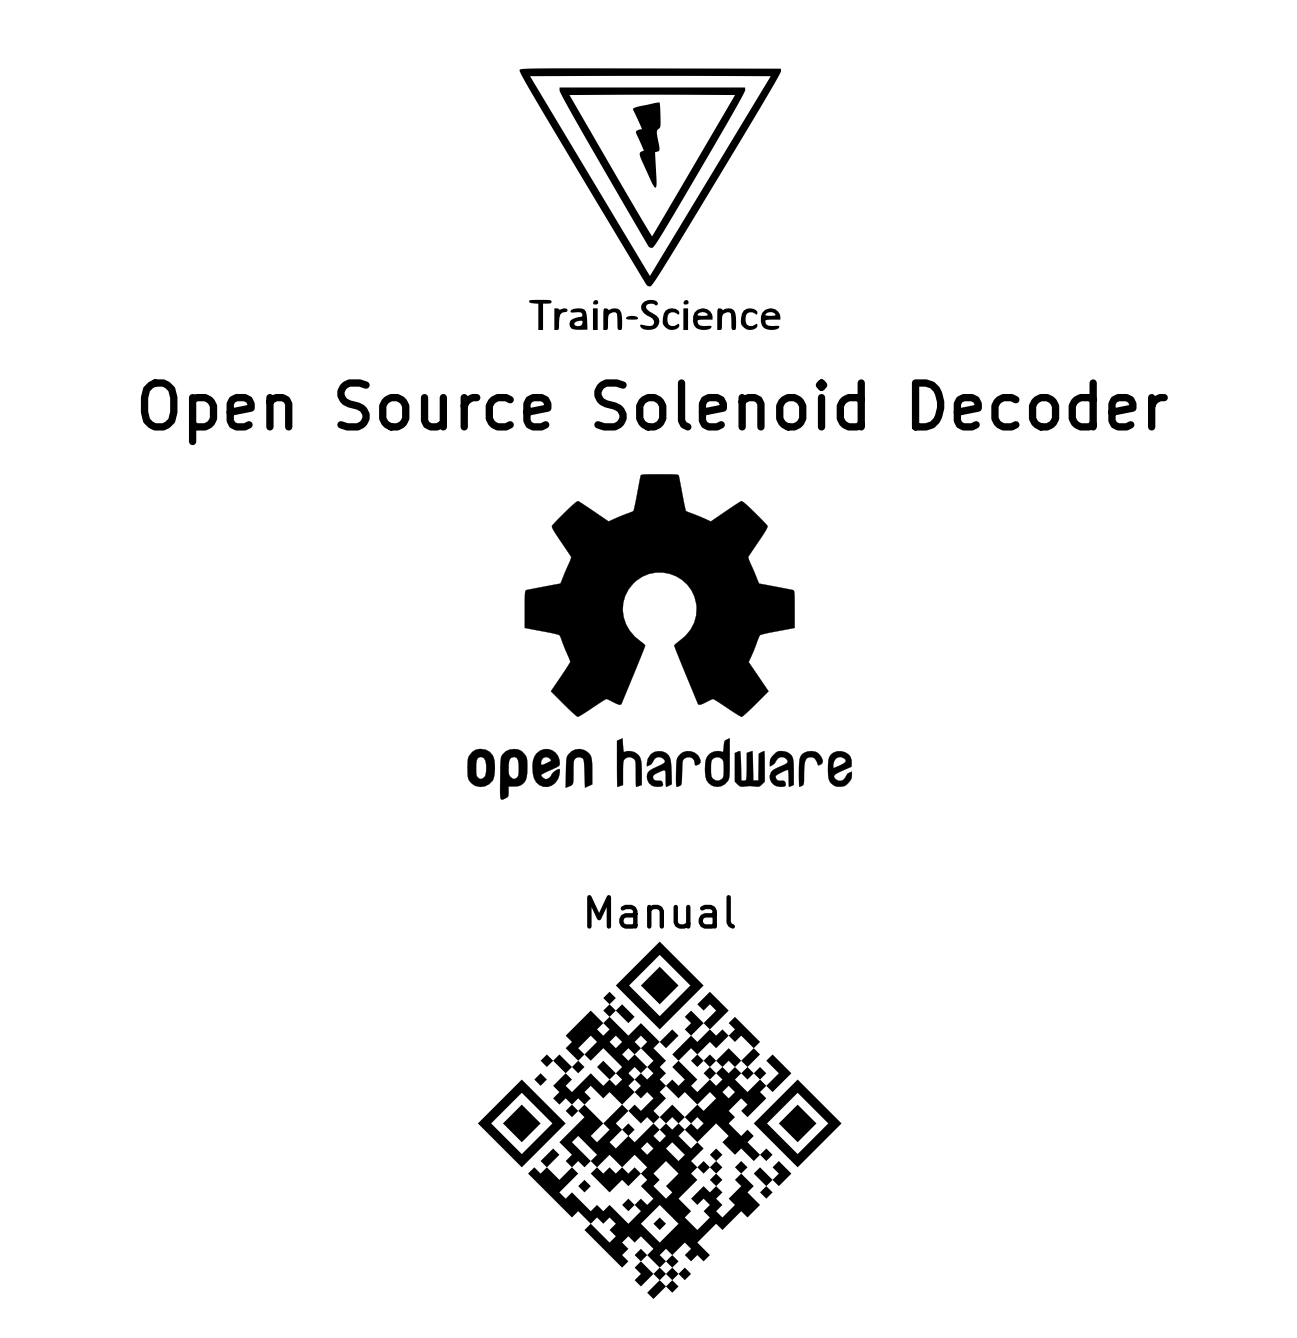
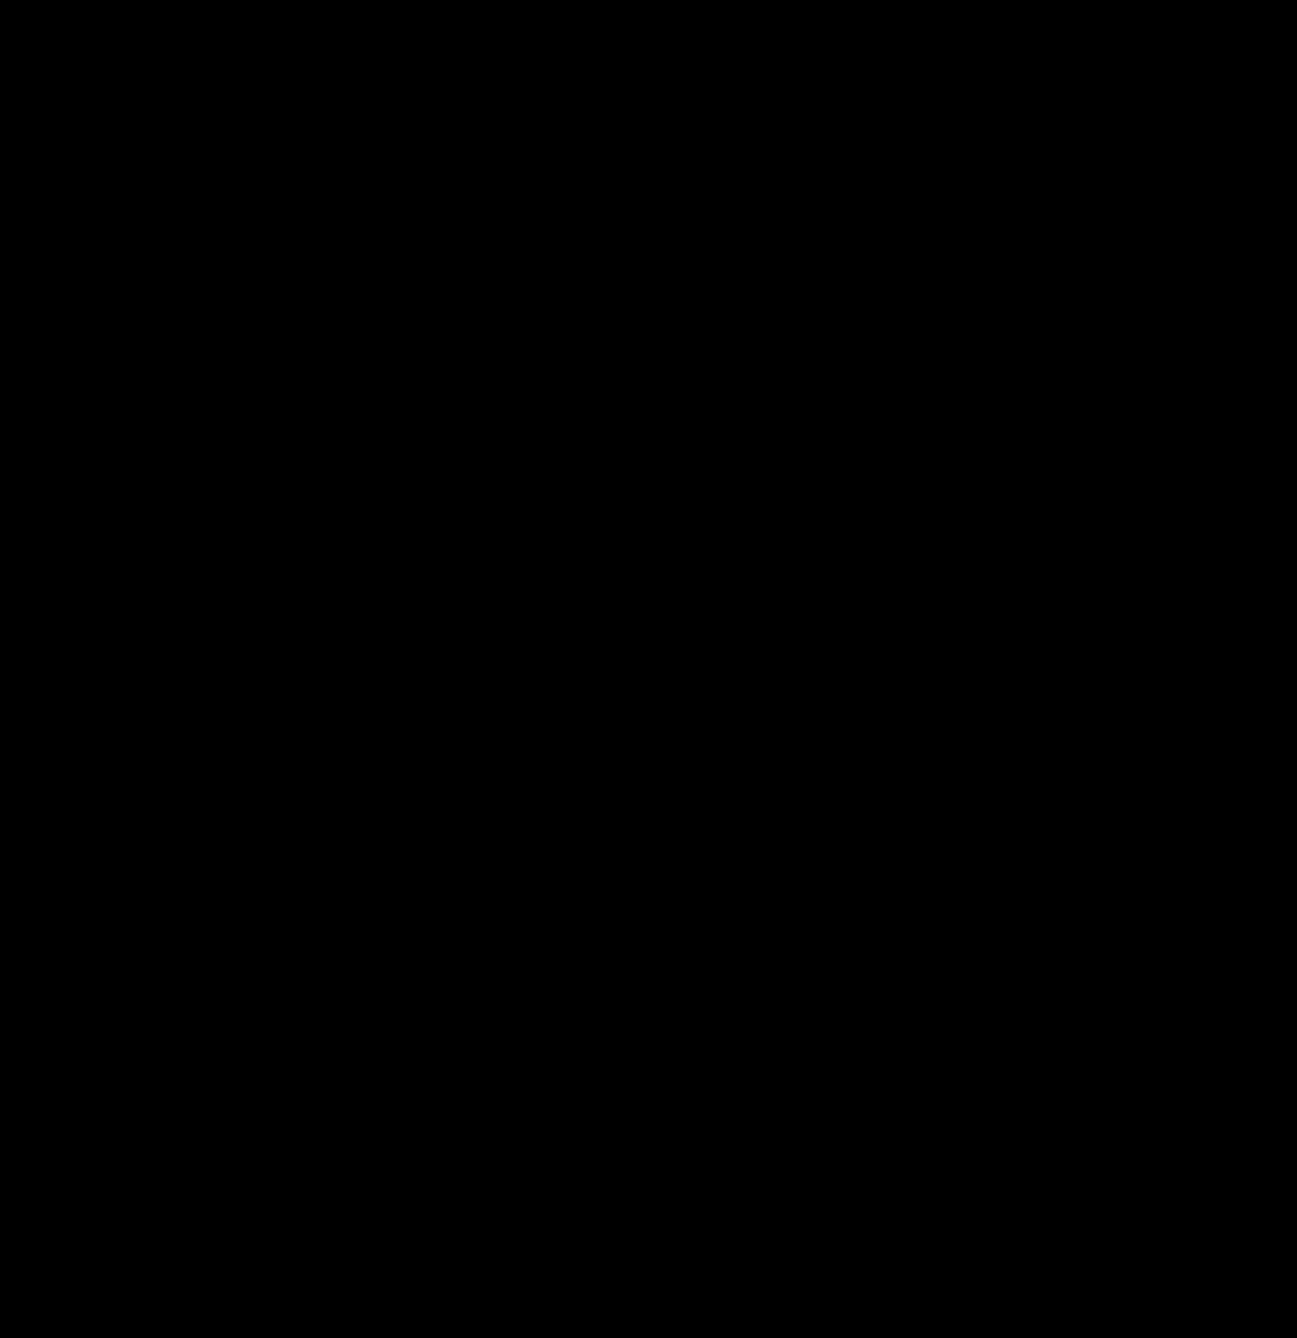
drawing: [519, 68, 782, 330] -> none
text: Open Source Solenoid Decoder (654, 412) -> none
drawing: [467, 474, 853, 800] -> none
text: Manual (661, 911) -> none
drawing: [477, 941, 842, 1299] -> none

